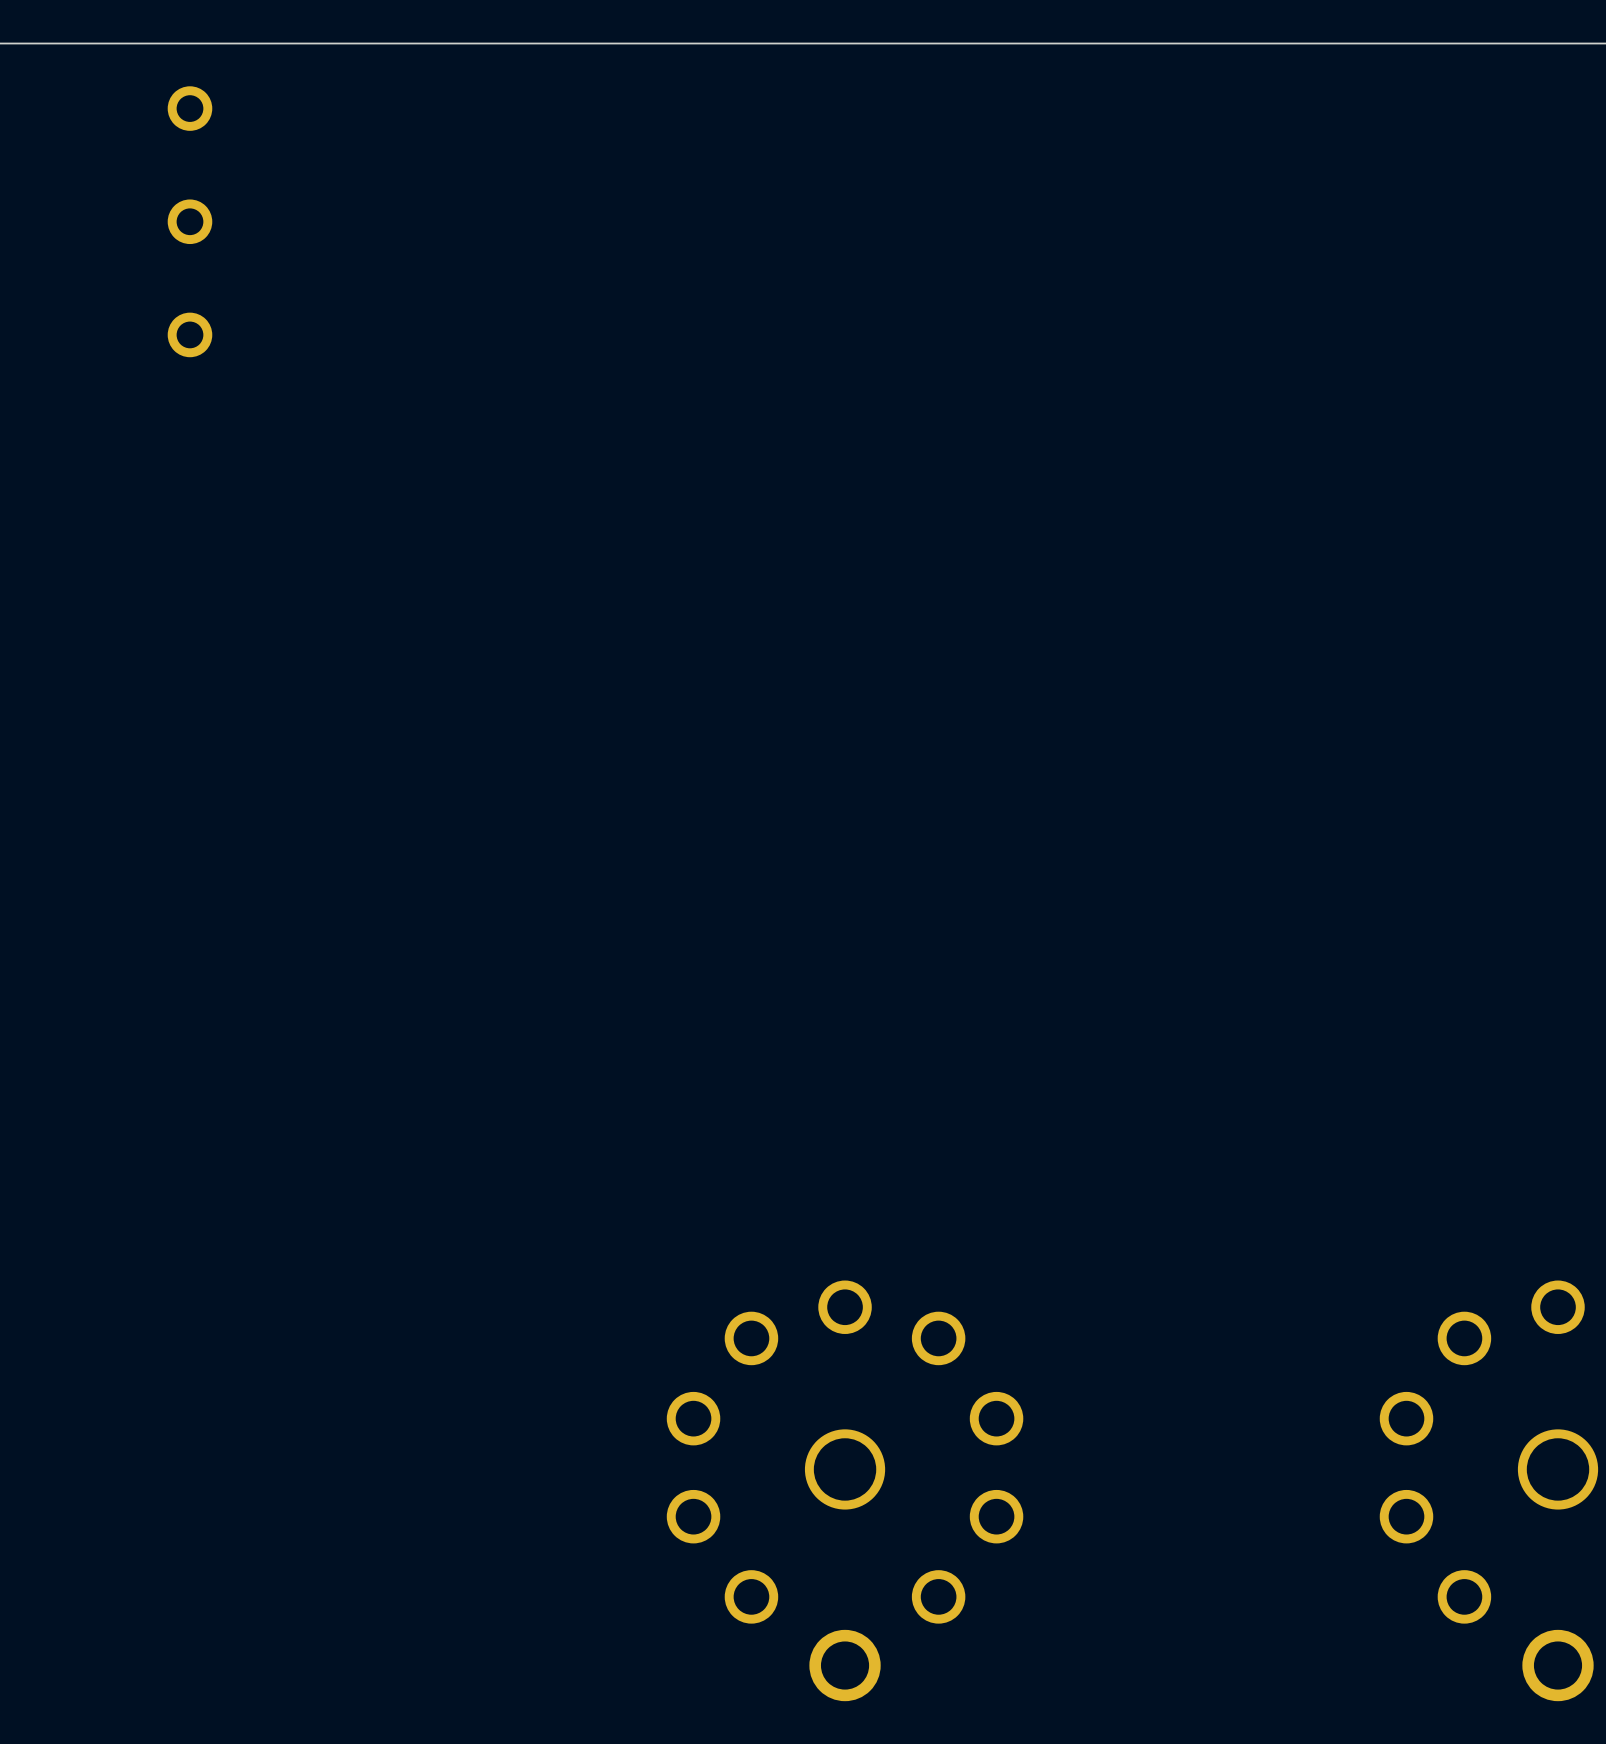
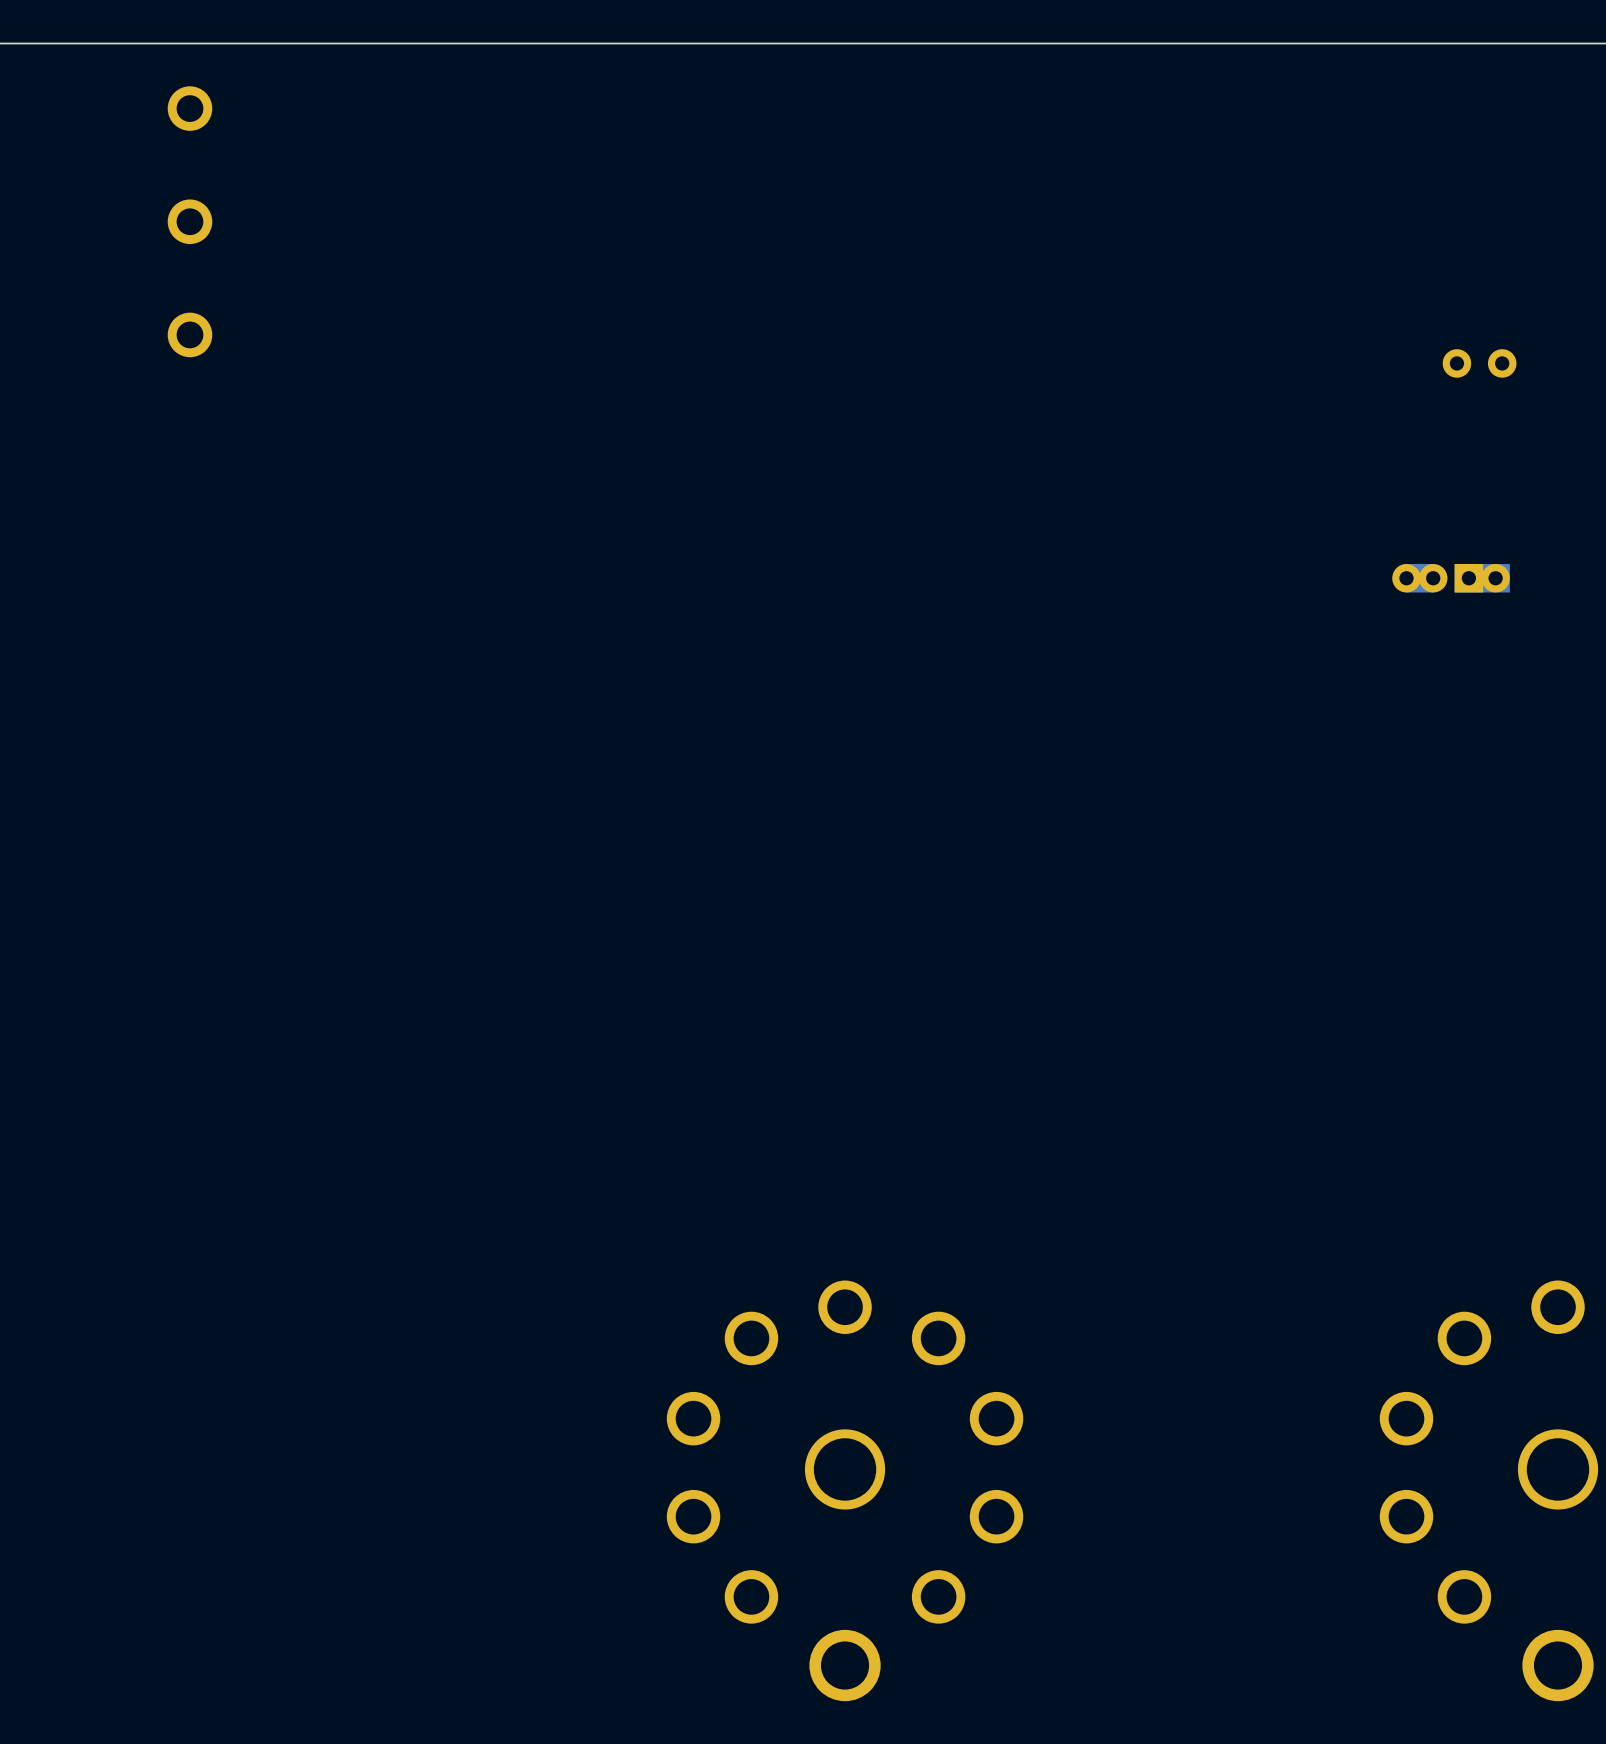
part: none -> (1479, 363)
part: none -> (1451, 578)

